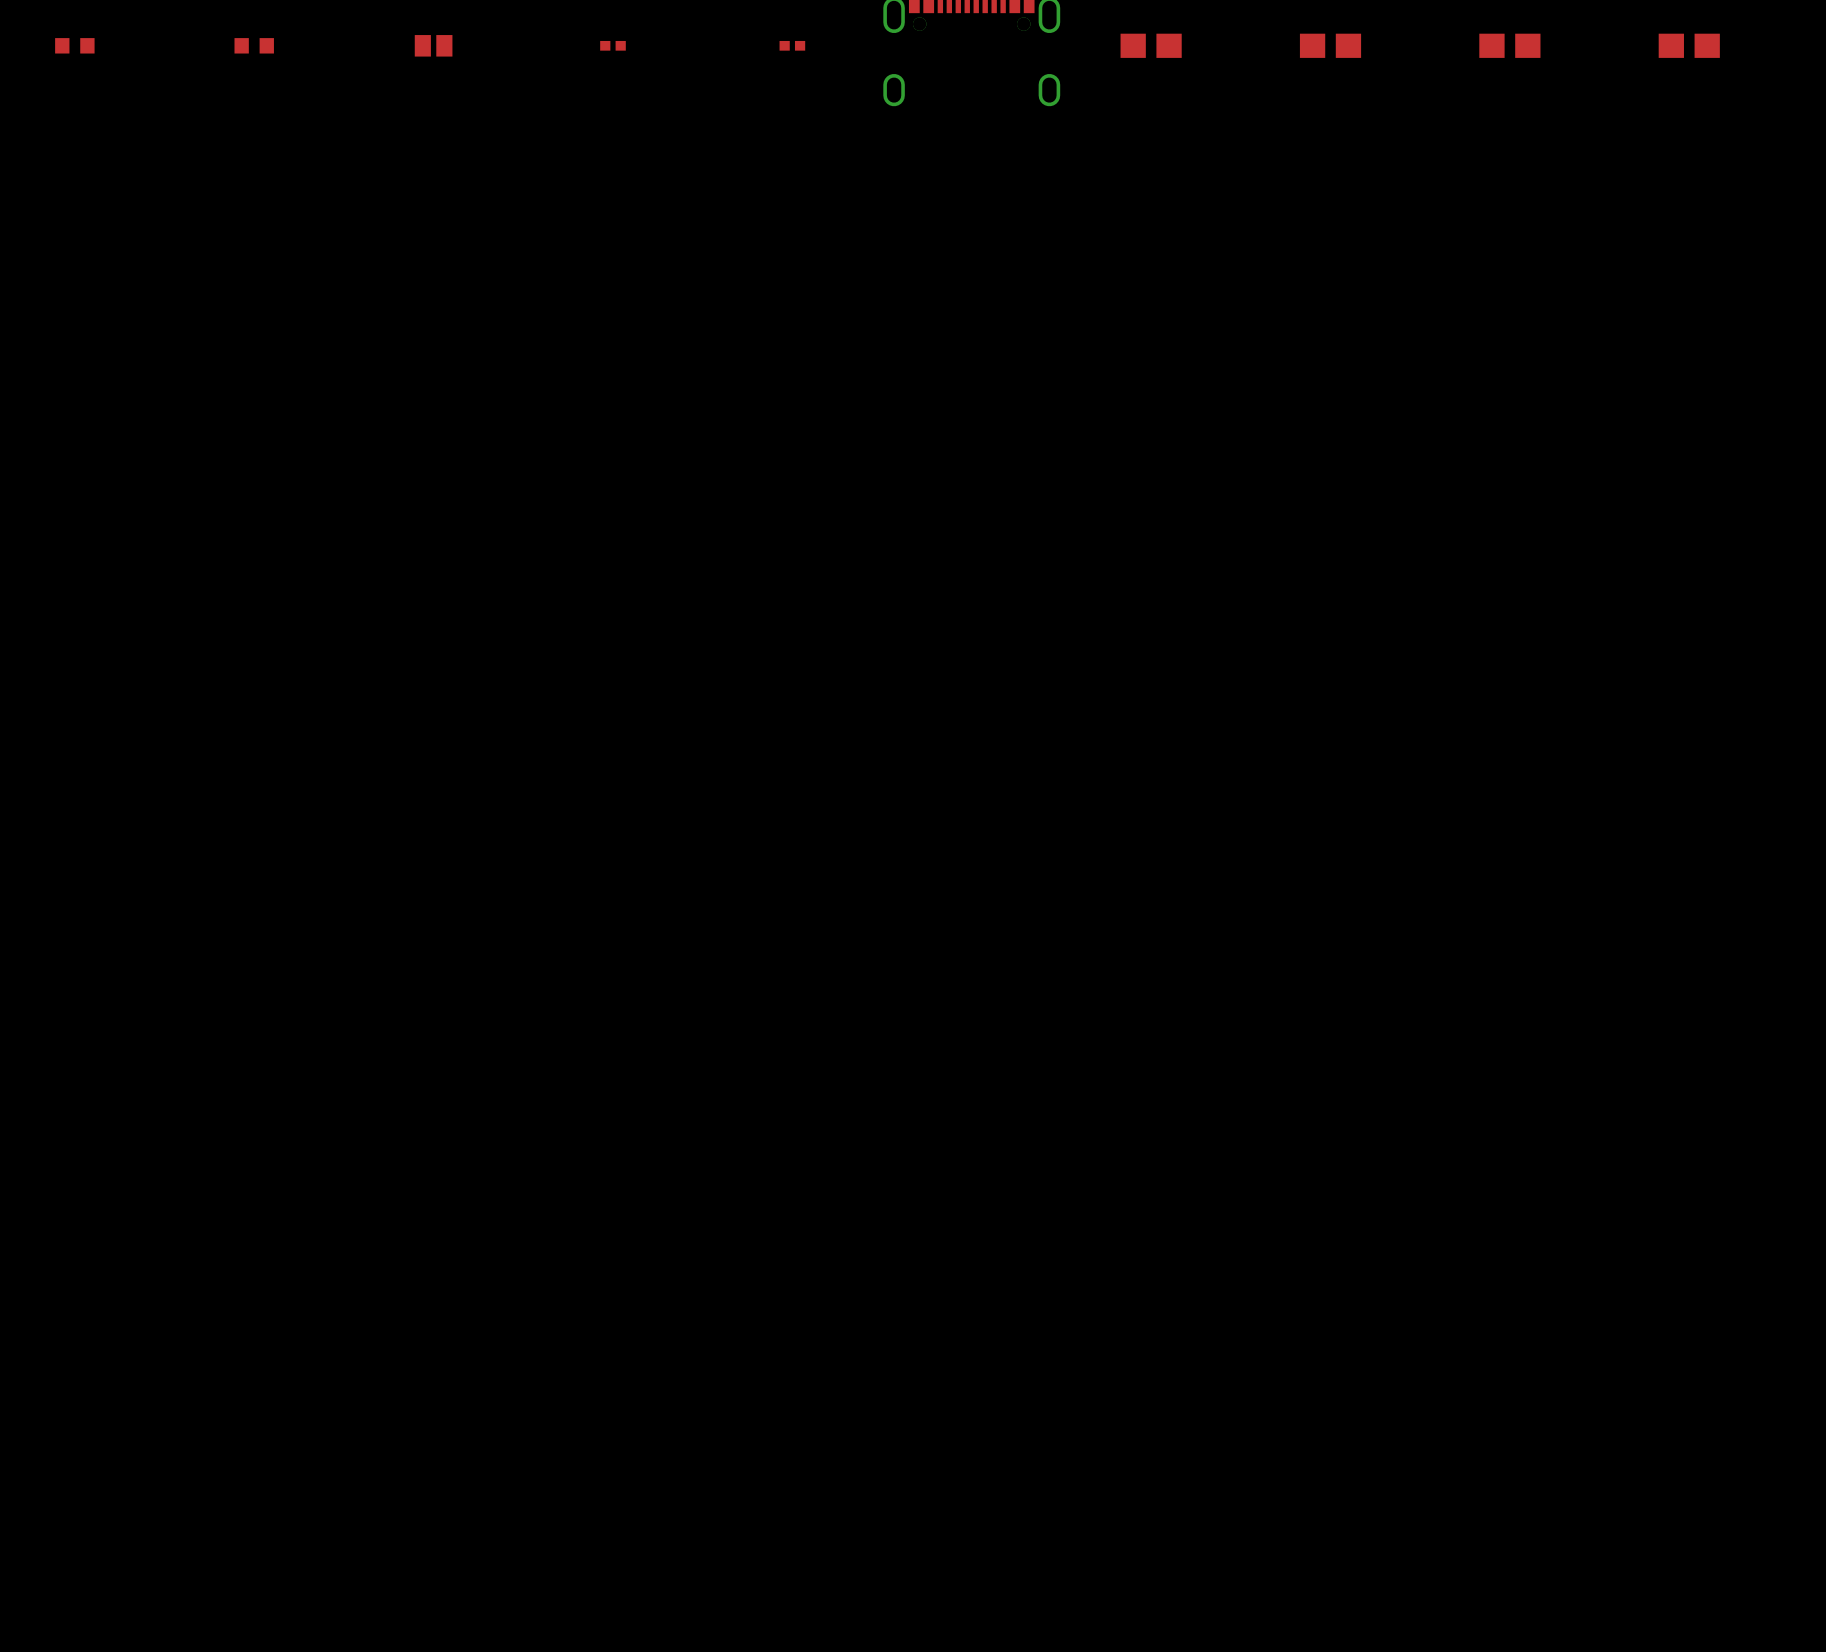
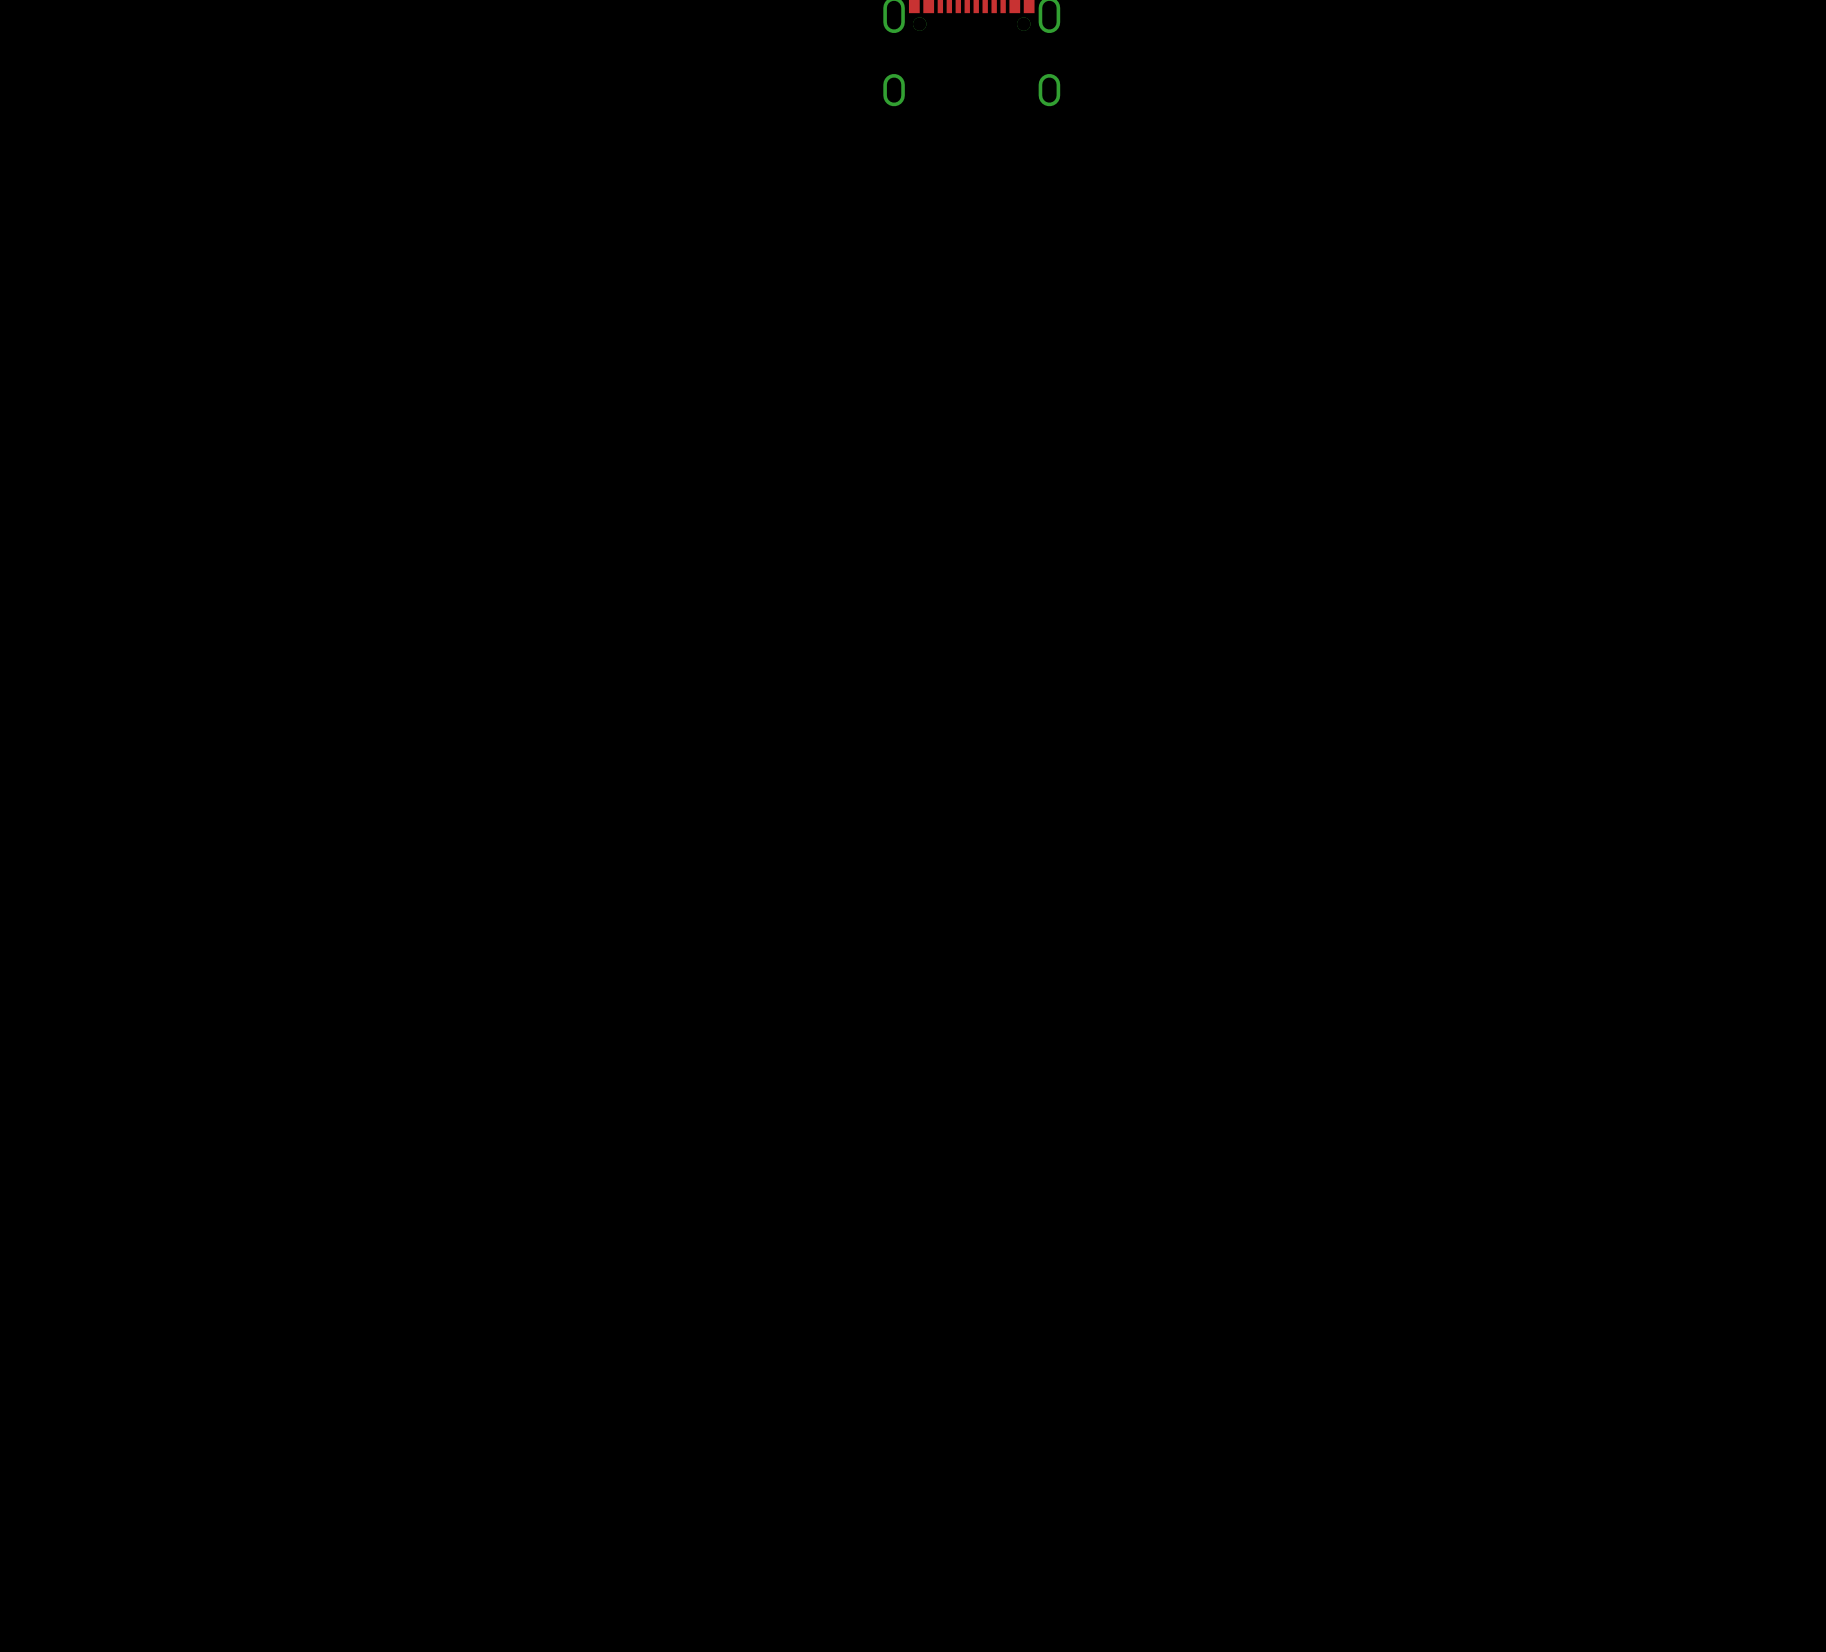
part: (74, 45) -> none
part: (254, 45) -> none
part: (433, 45) -> none
part: (612, 45) -> none
part: (792, 45) -> none
part: (1151, 45) -> none
part: (1330, 45) -> none
part: (1509, 45) -> none
part: (1689, 45) -> none

